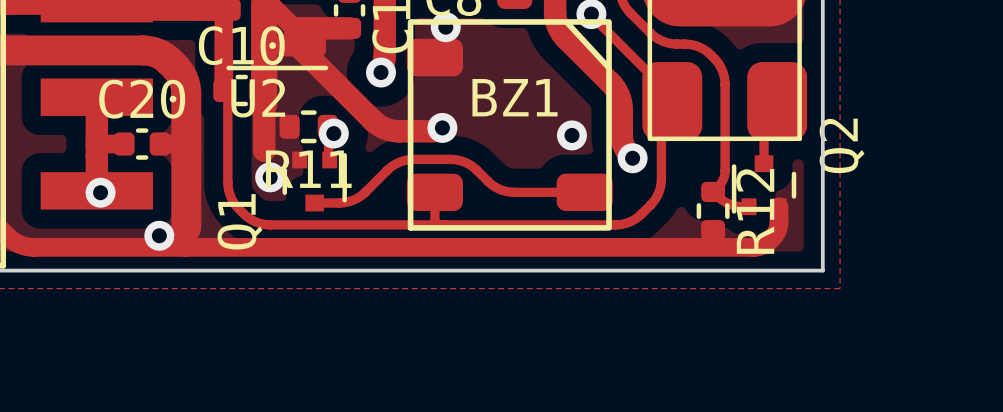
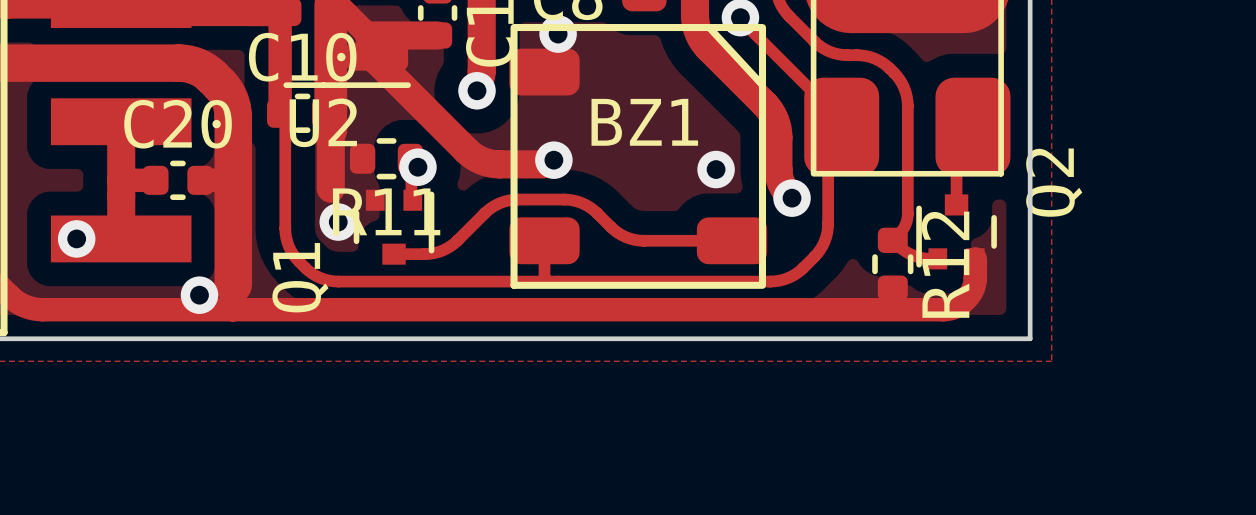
via position: (100, 192) -> (76, 238)

